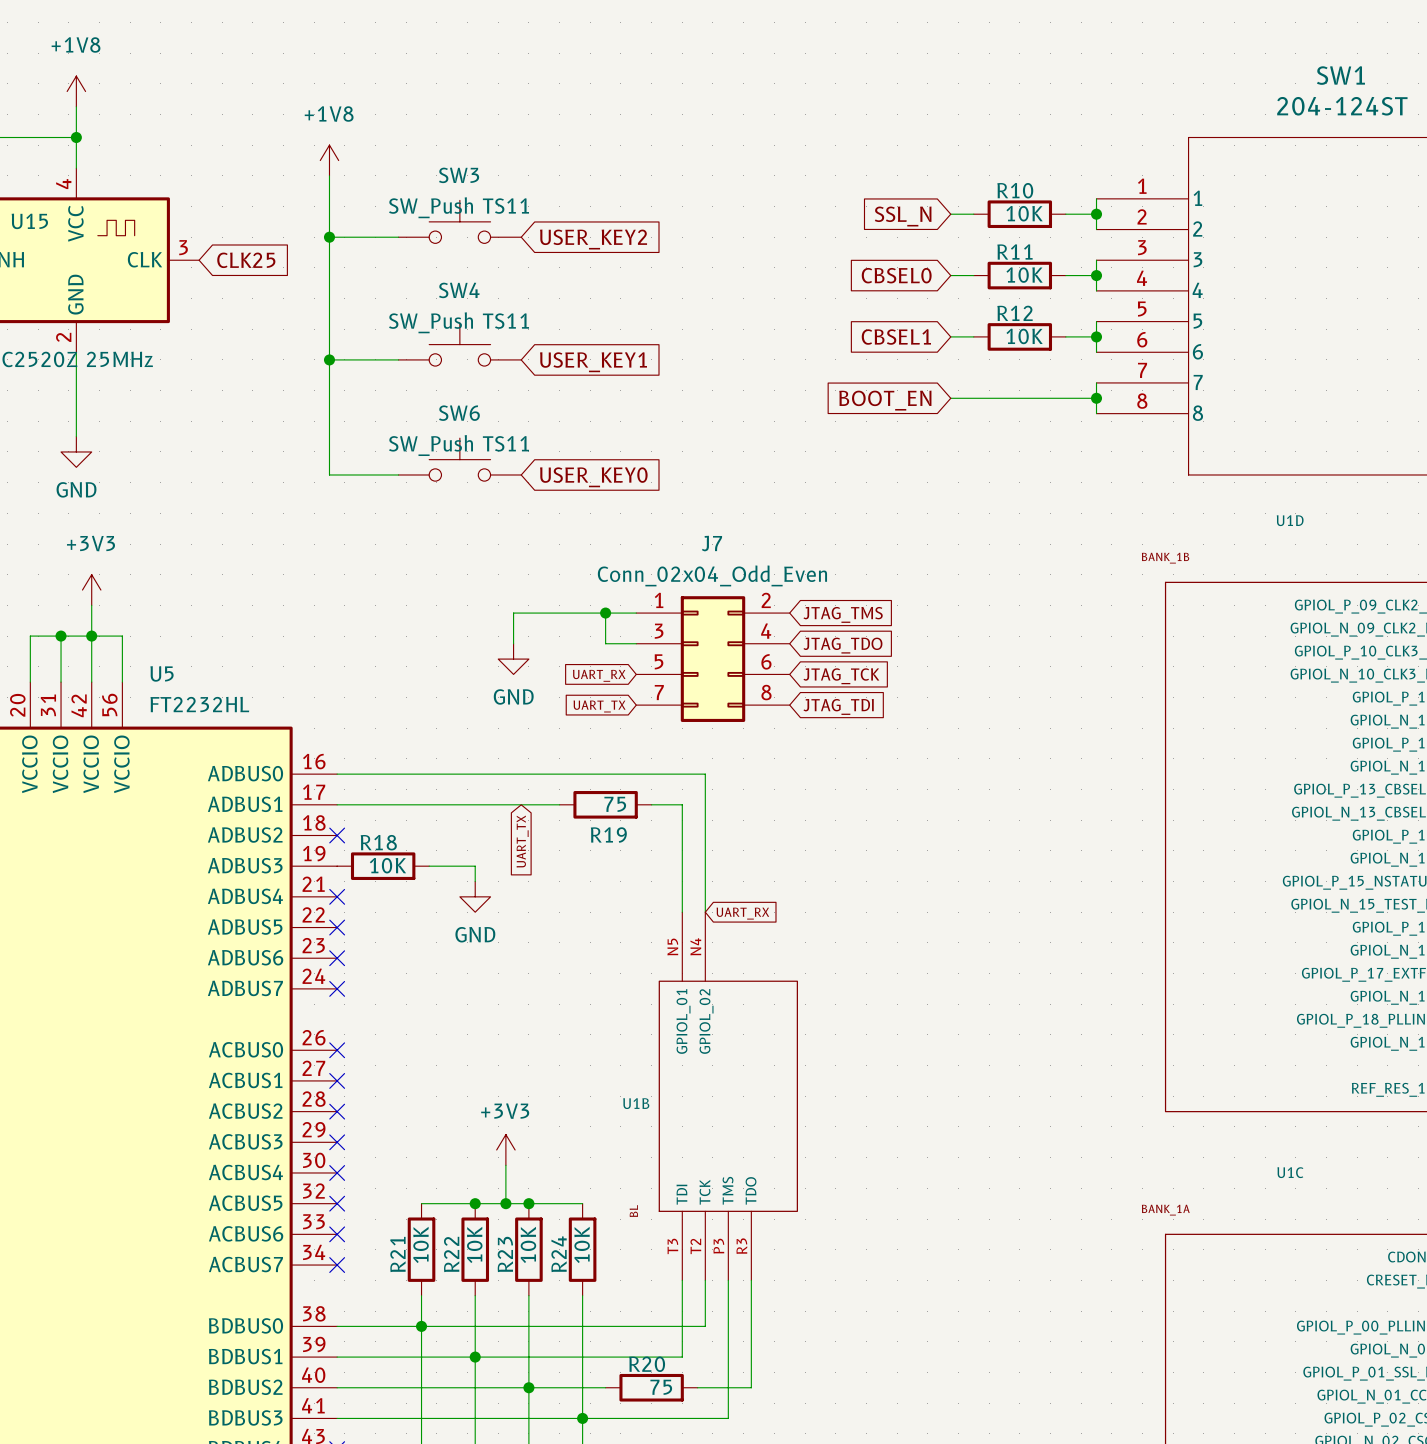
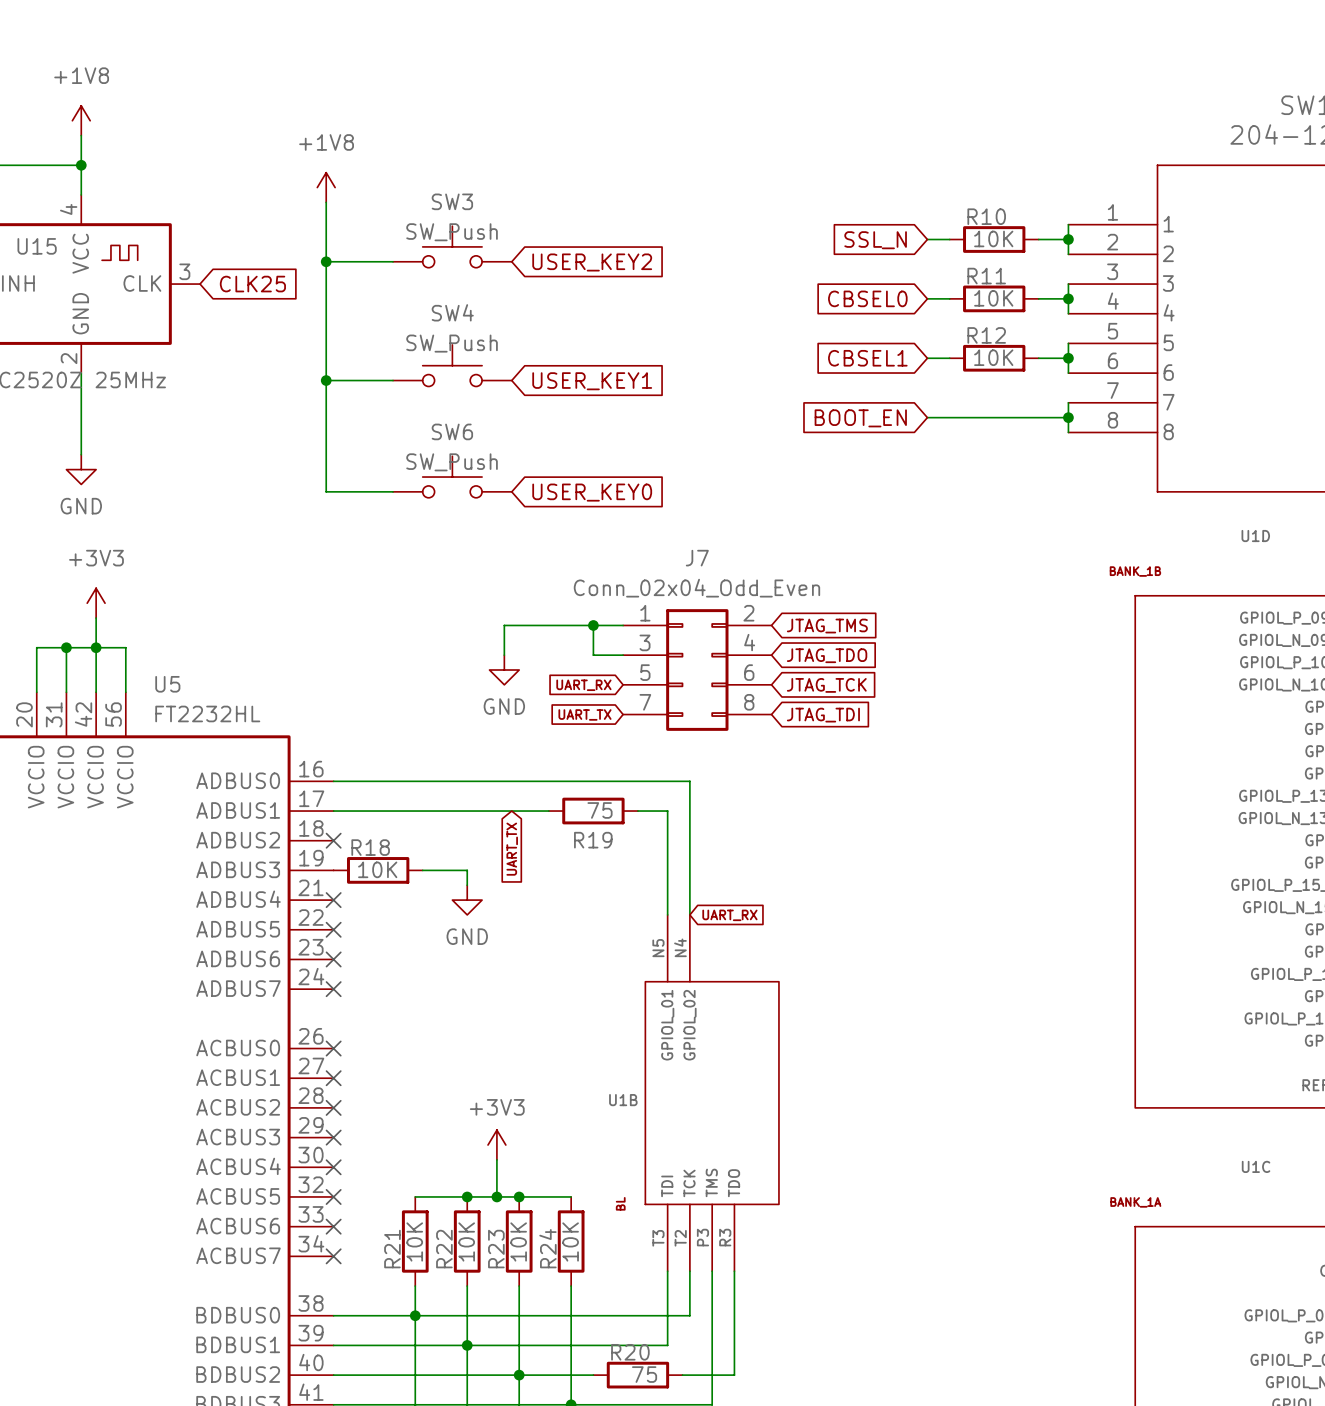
SW3 value: SW_Push TS11 (459, 207) -> SW_Push (452, 232)
SW4 value: SW_Push TS11 (459, 322) -> SW_Push (452, 343)
SW6 value: SW_Push TS11 (459, 445) -> SW_Push (452, 462)

